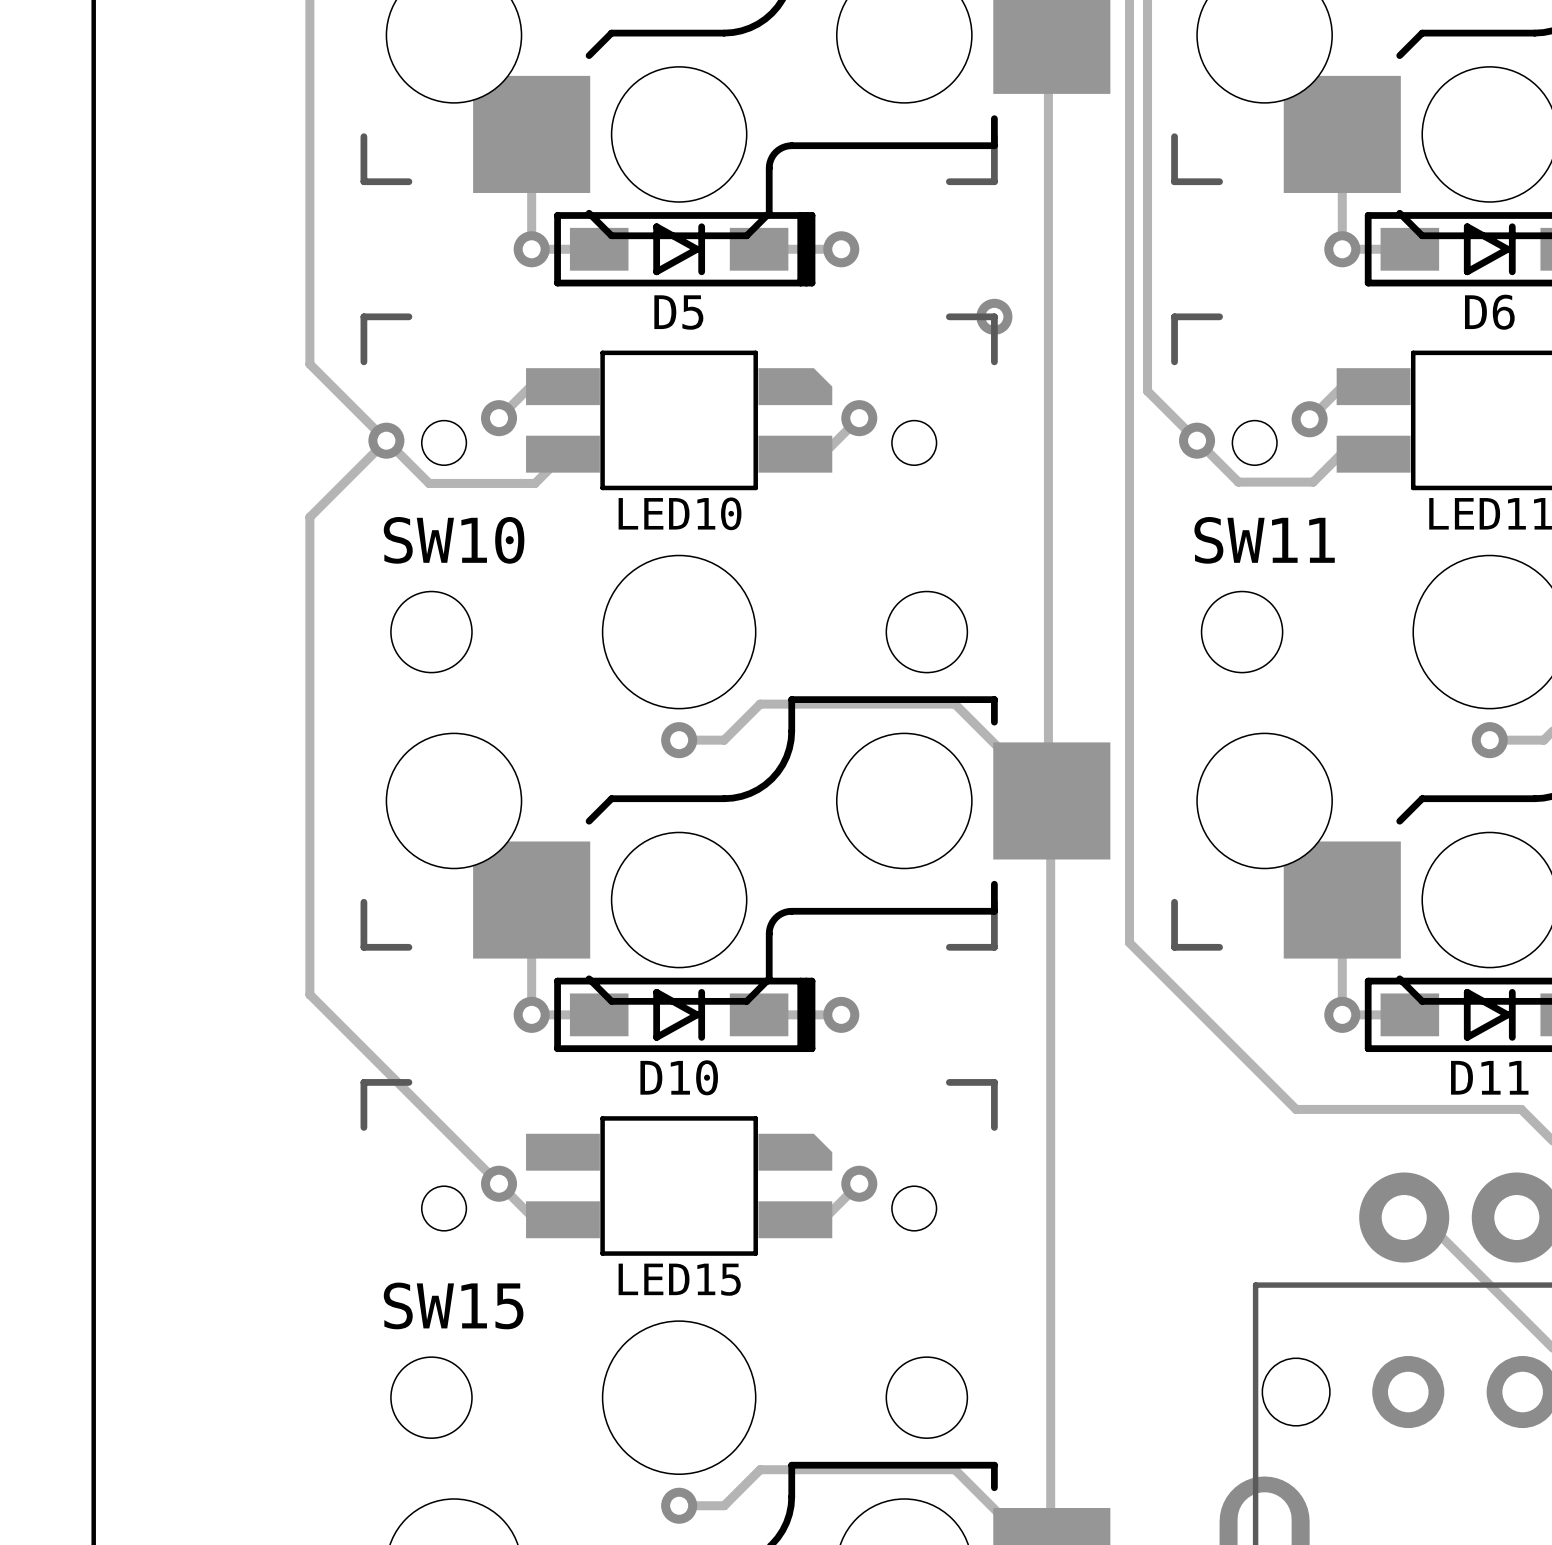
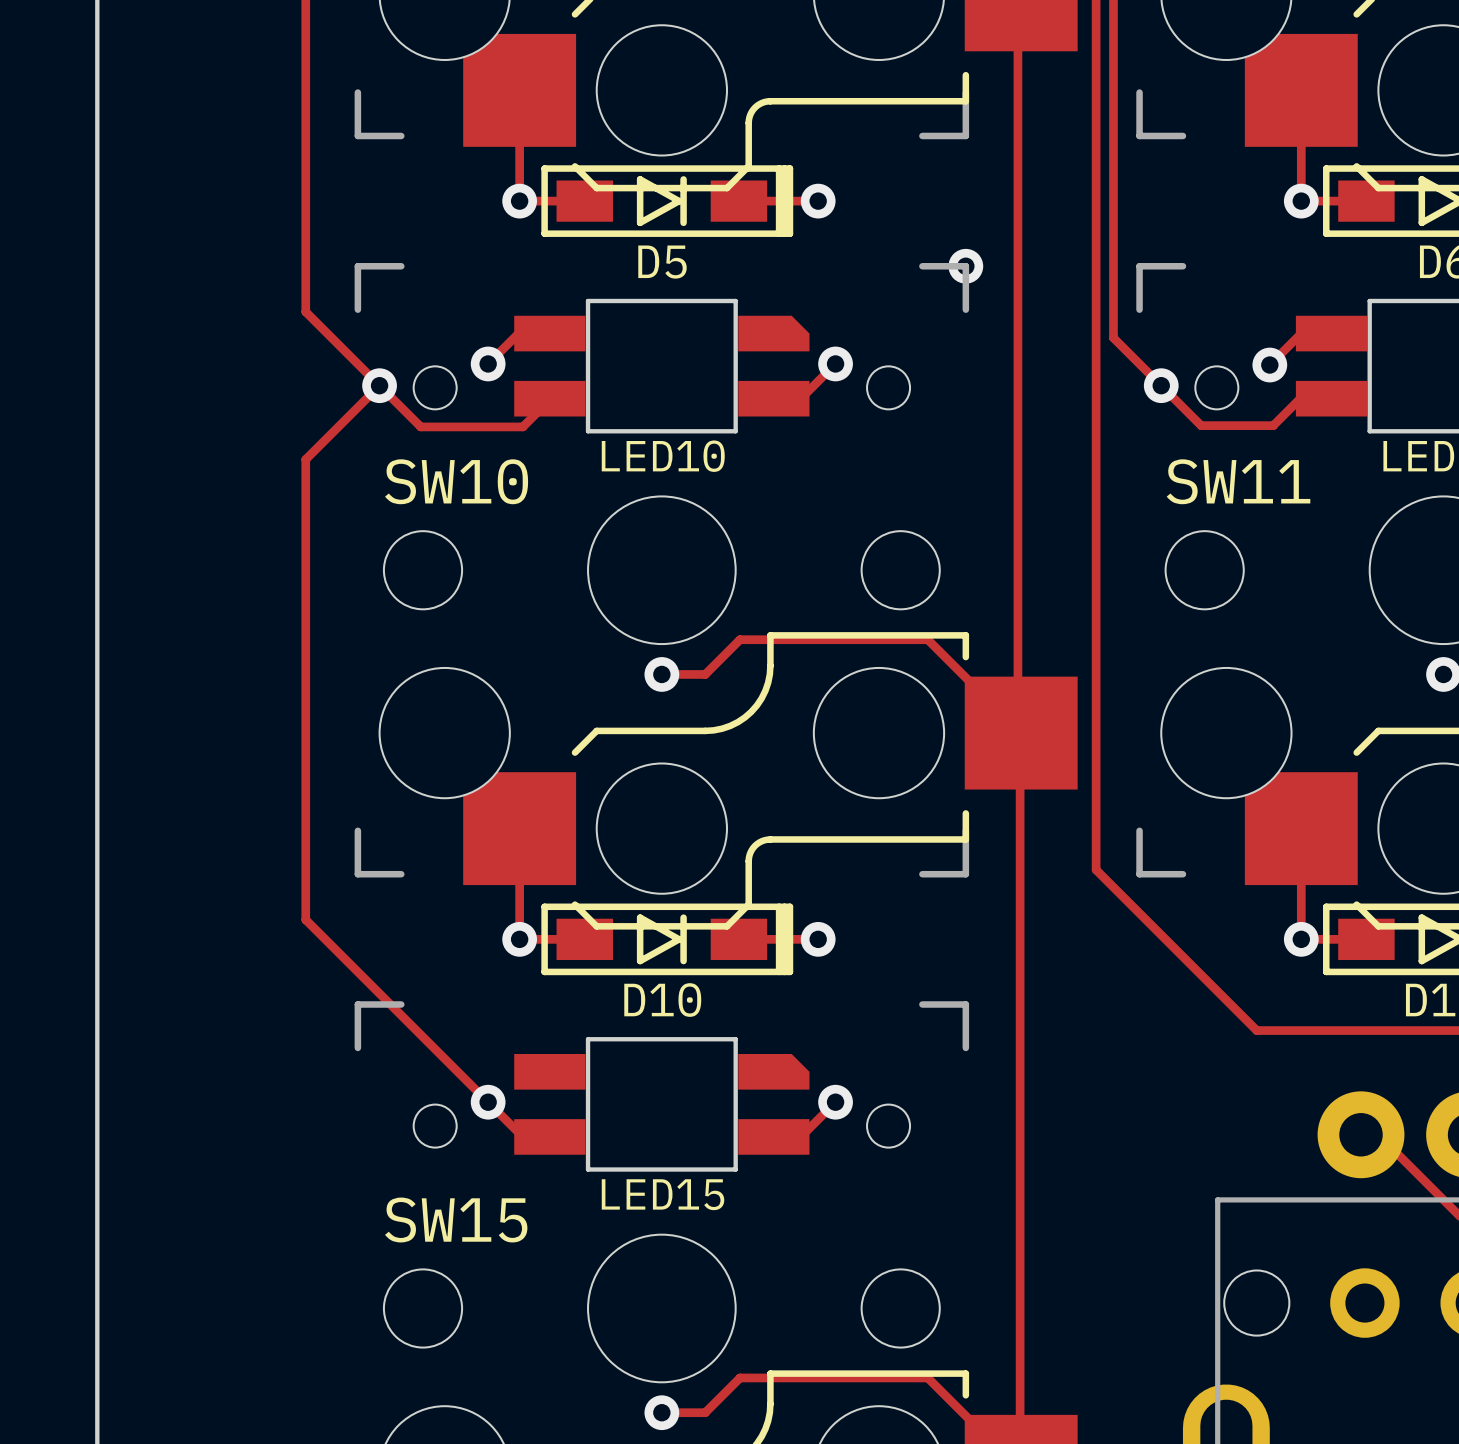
SW10 name position: SW10 (454, 540) -> SW10 (456, 481)
SW11 name position: SW11 (1264, 540) -> SW11 (1238, 481)
SW15 name position: SW15 (453, 1305) -> SW15 (456, 1220)

